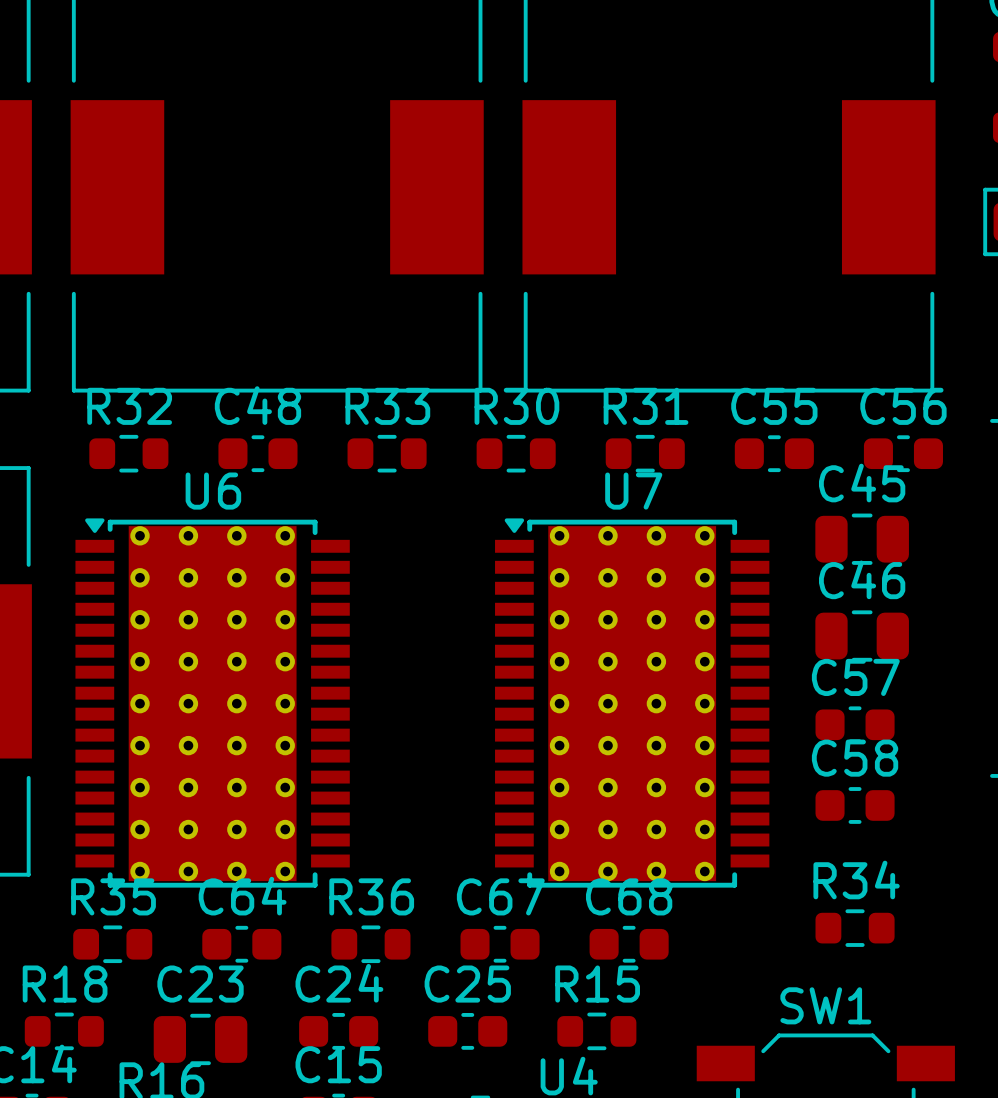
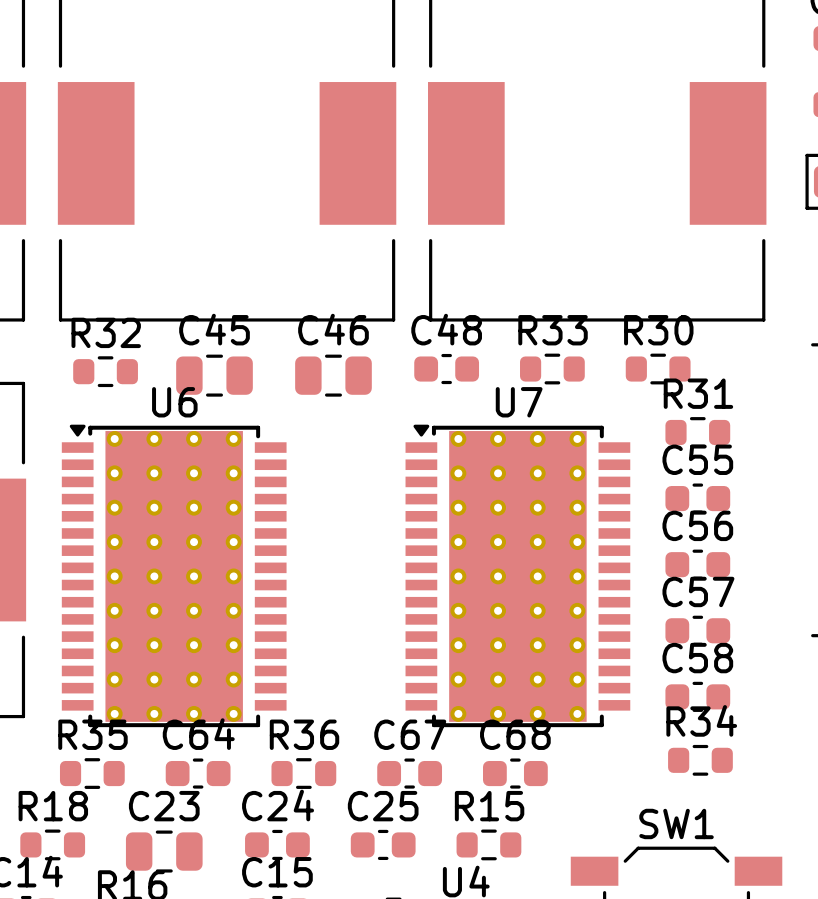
C48 position: (257, 453) -> (446, 369)
R33 position: (387, 453) -> (552, 369)
R30 position: (516, 453) -> (658, 369)
R31 position: (645, 453) -> (697, 432)
C55 position: (774, 453) -> (697, 498)
C56 position: (903, 453) -> (697, 564)
C45 position: (862, 539) -> (214, 375)
C46 position: (862, 636) -> (333, 375)
C57 position: (855, 724) -> (697, 630)
C58 position: (855, 805) -> (697, 696)

